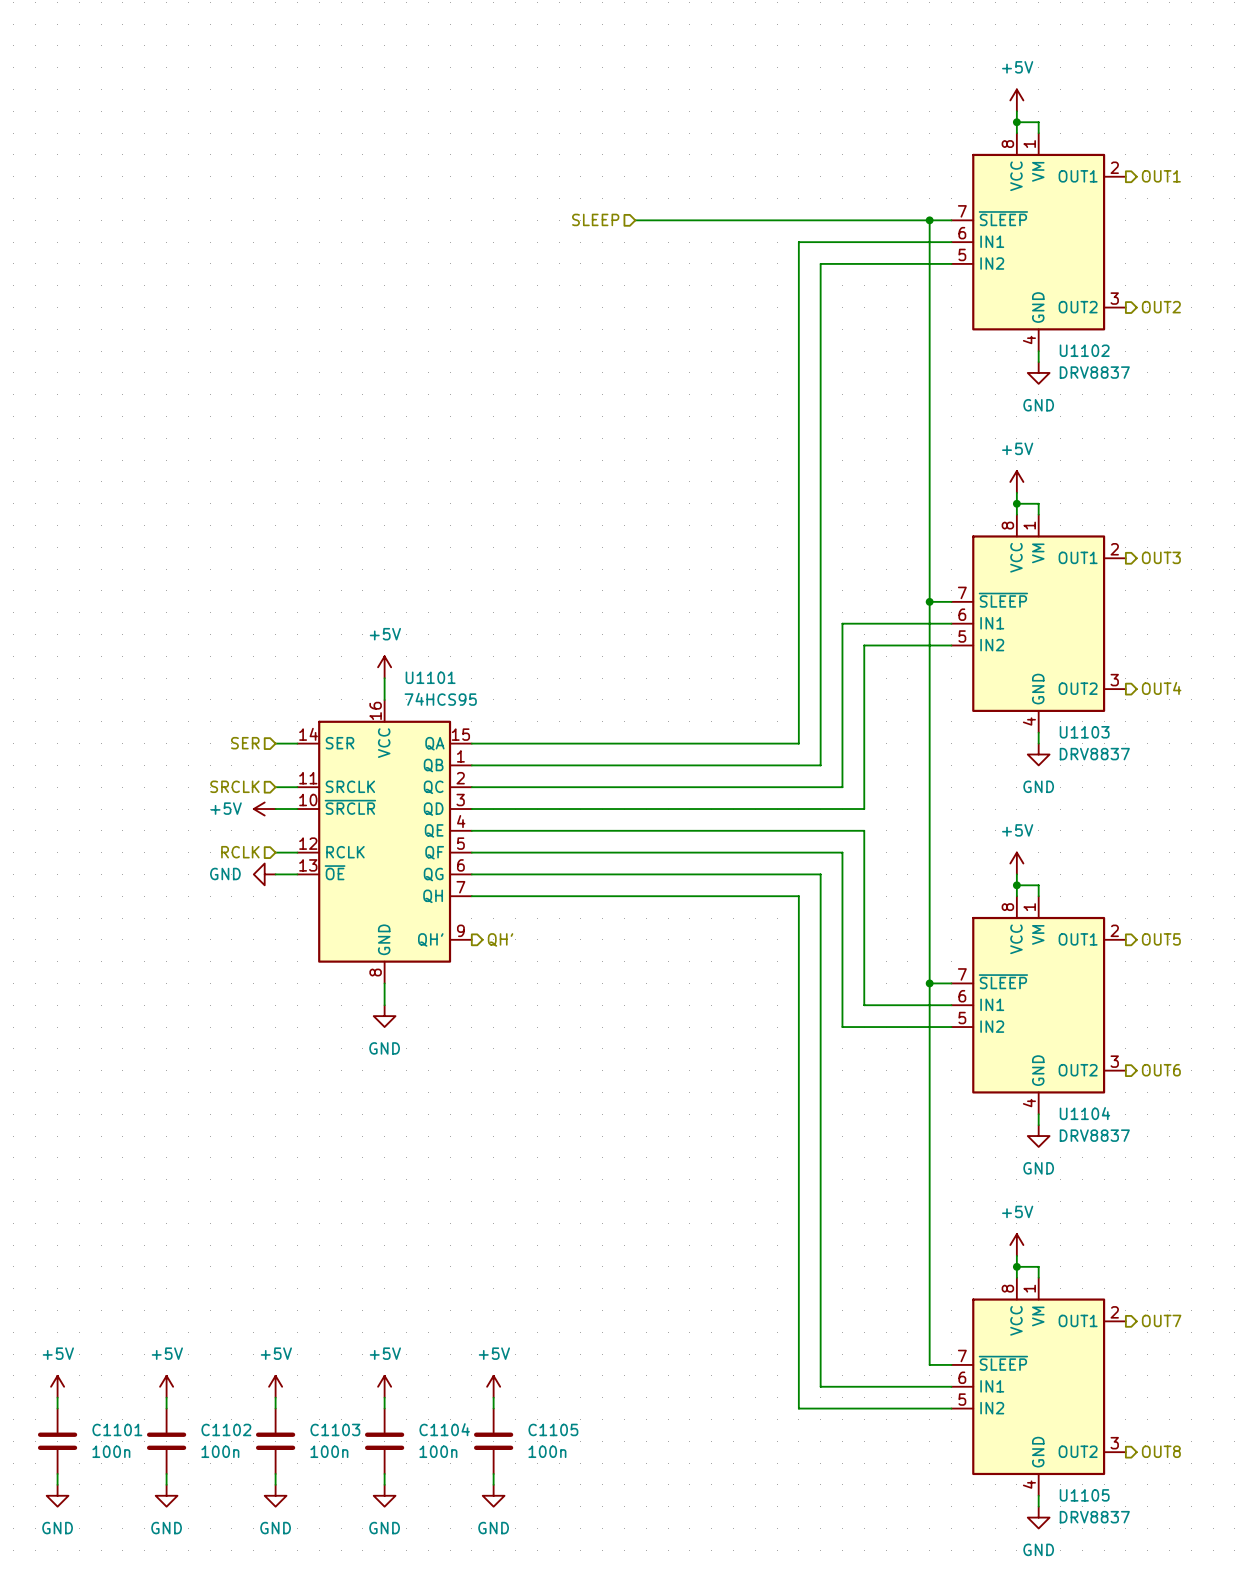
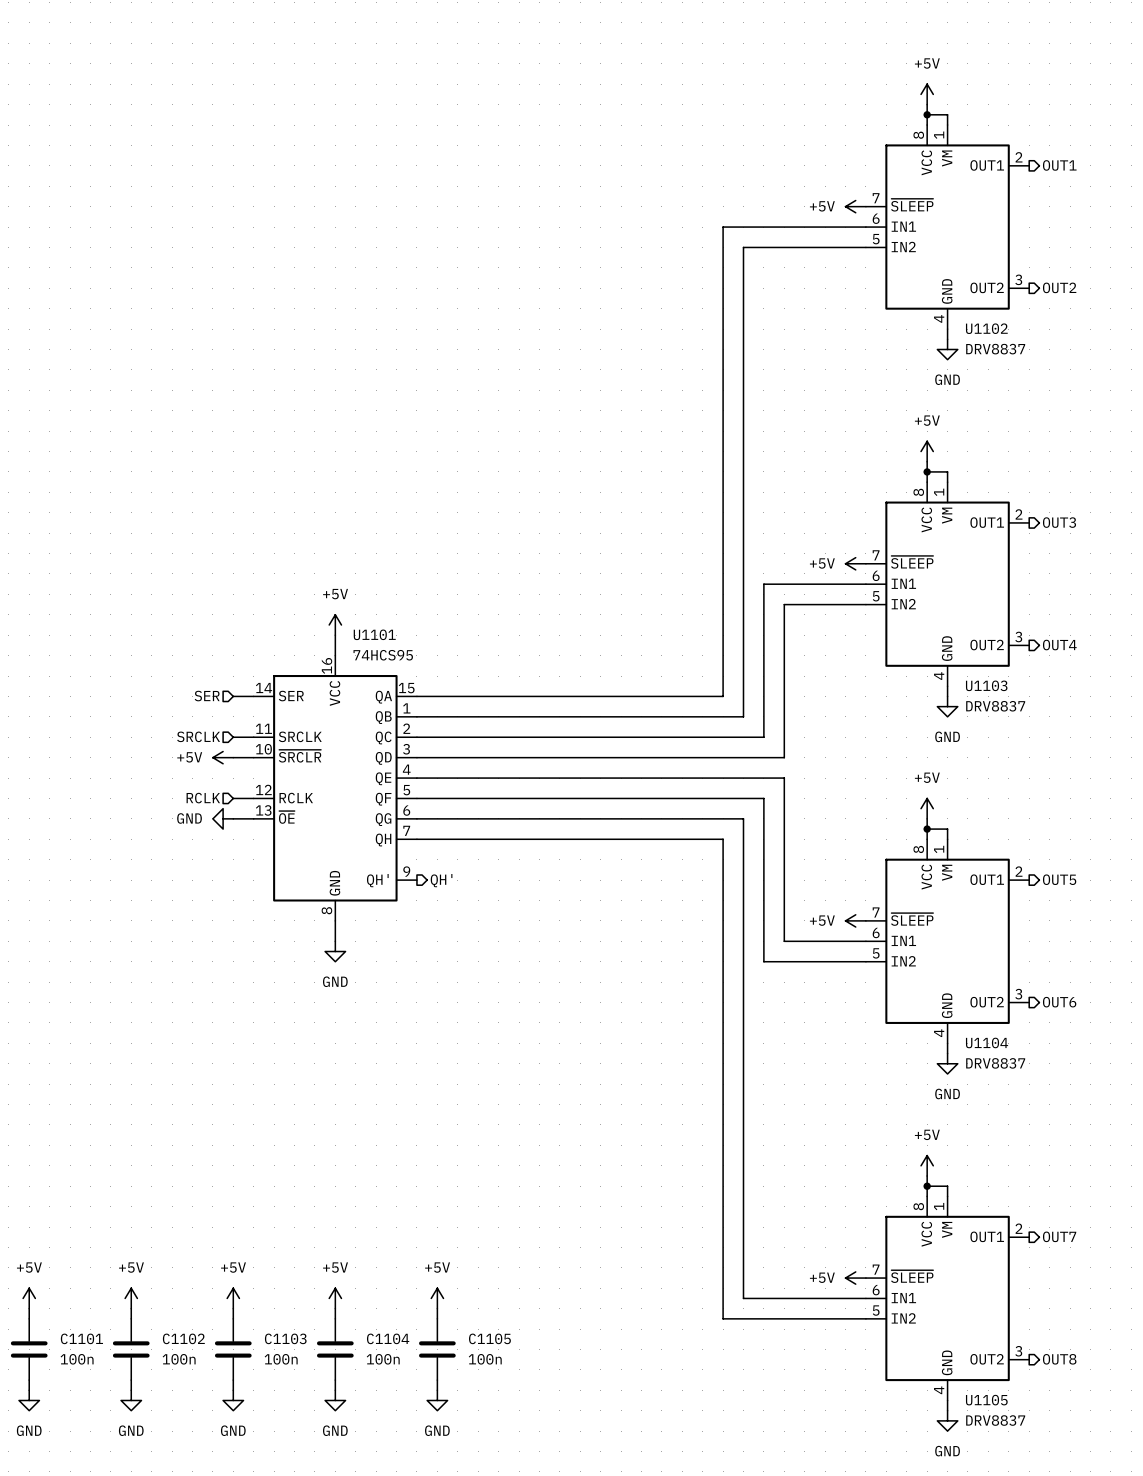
hierarchical label: SLEEP (595, 219) -> none
wire: (635, 220) (951, 220) -> none
wire: (929, 220) (929, 1364) (951, 1364) -> none
junction: (929, 220) -> none
power symbol: none -> +5V (855, 206)
junction: (929, 601) -> none
power symbol: none -> +5V (855, 563)
junction: (929, 983) -> none
power symbol: none -> +5V (855, 920)
power symbol: none -> +5V (855, 1278)

